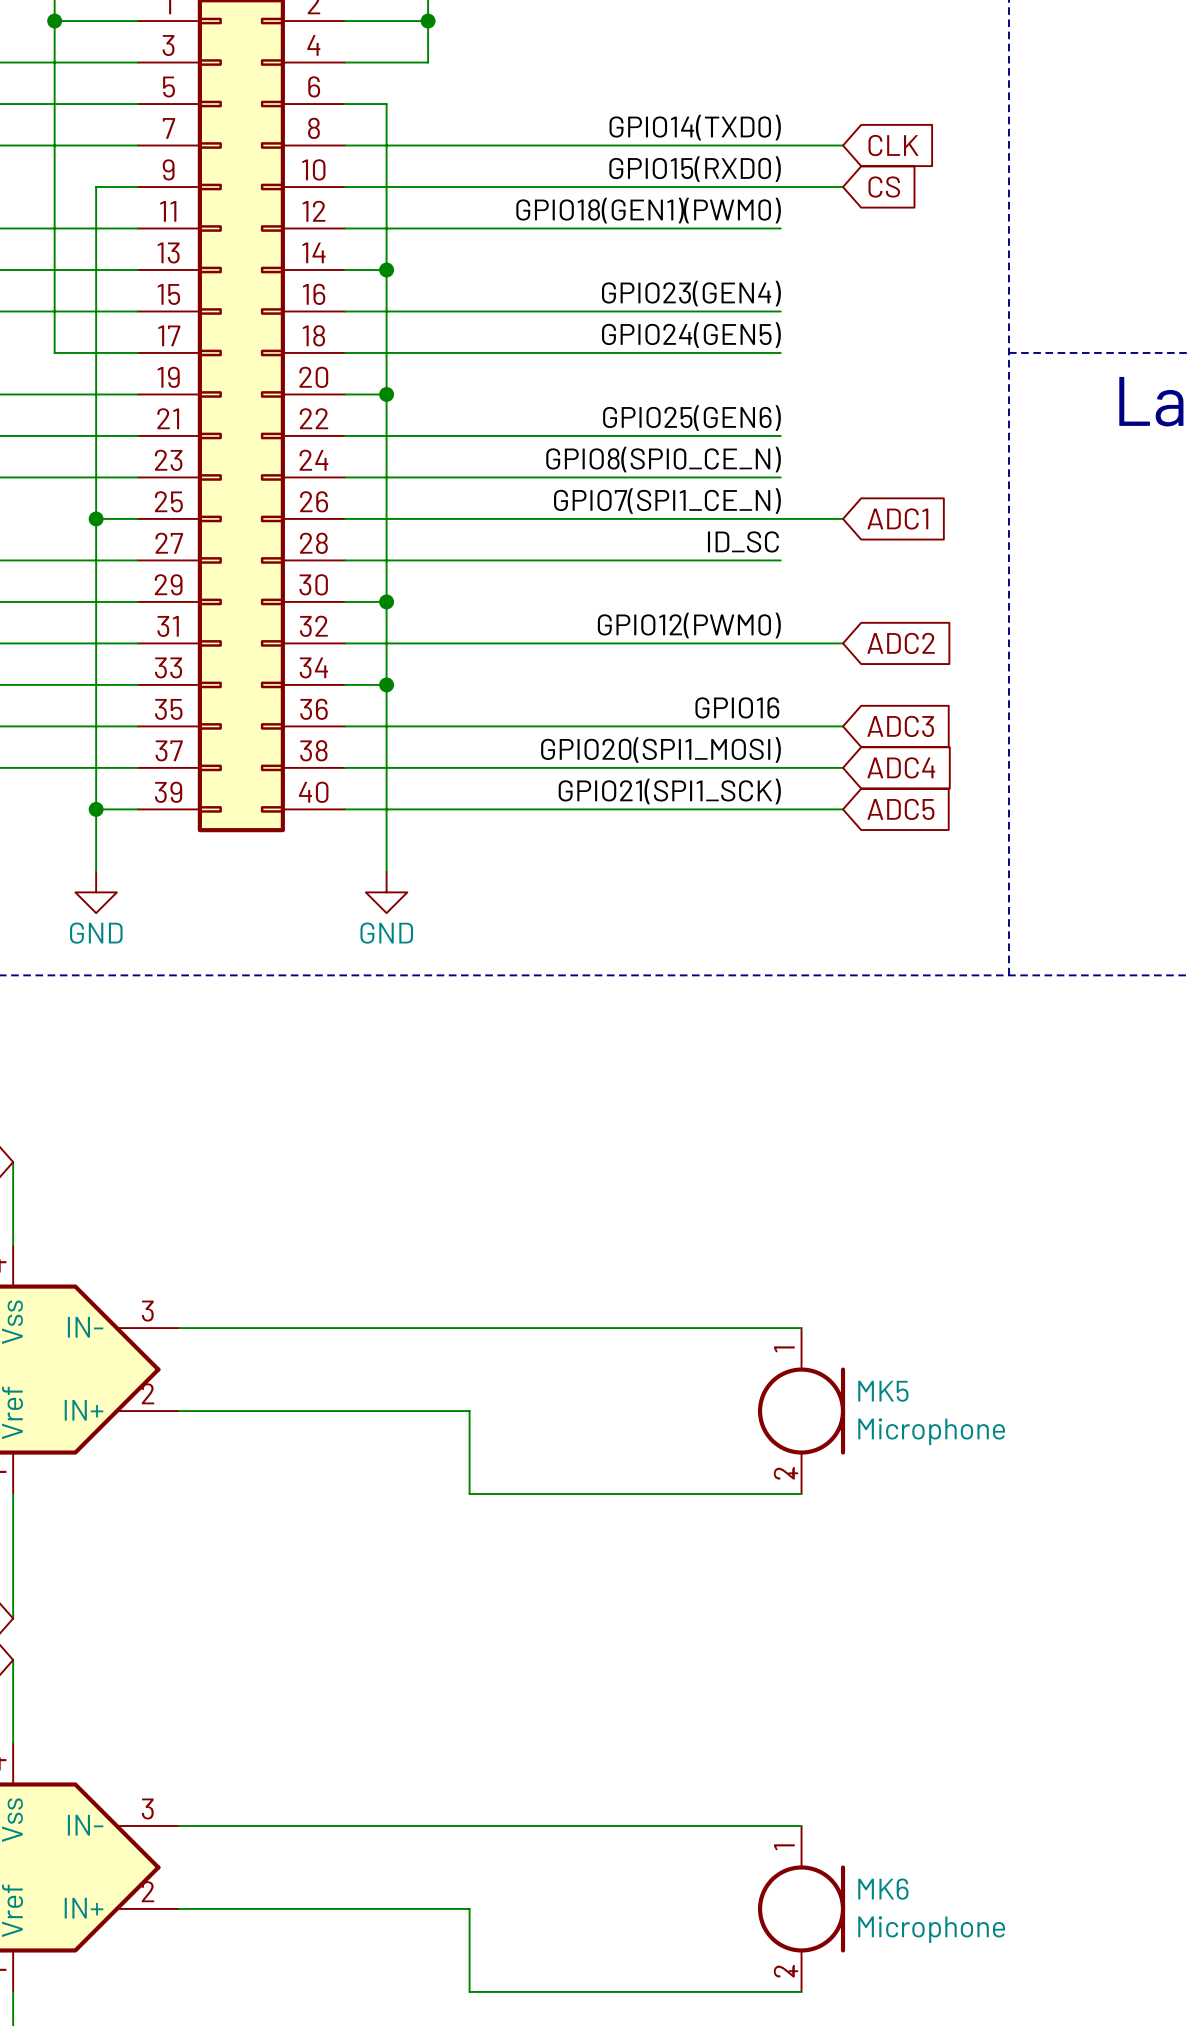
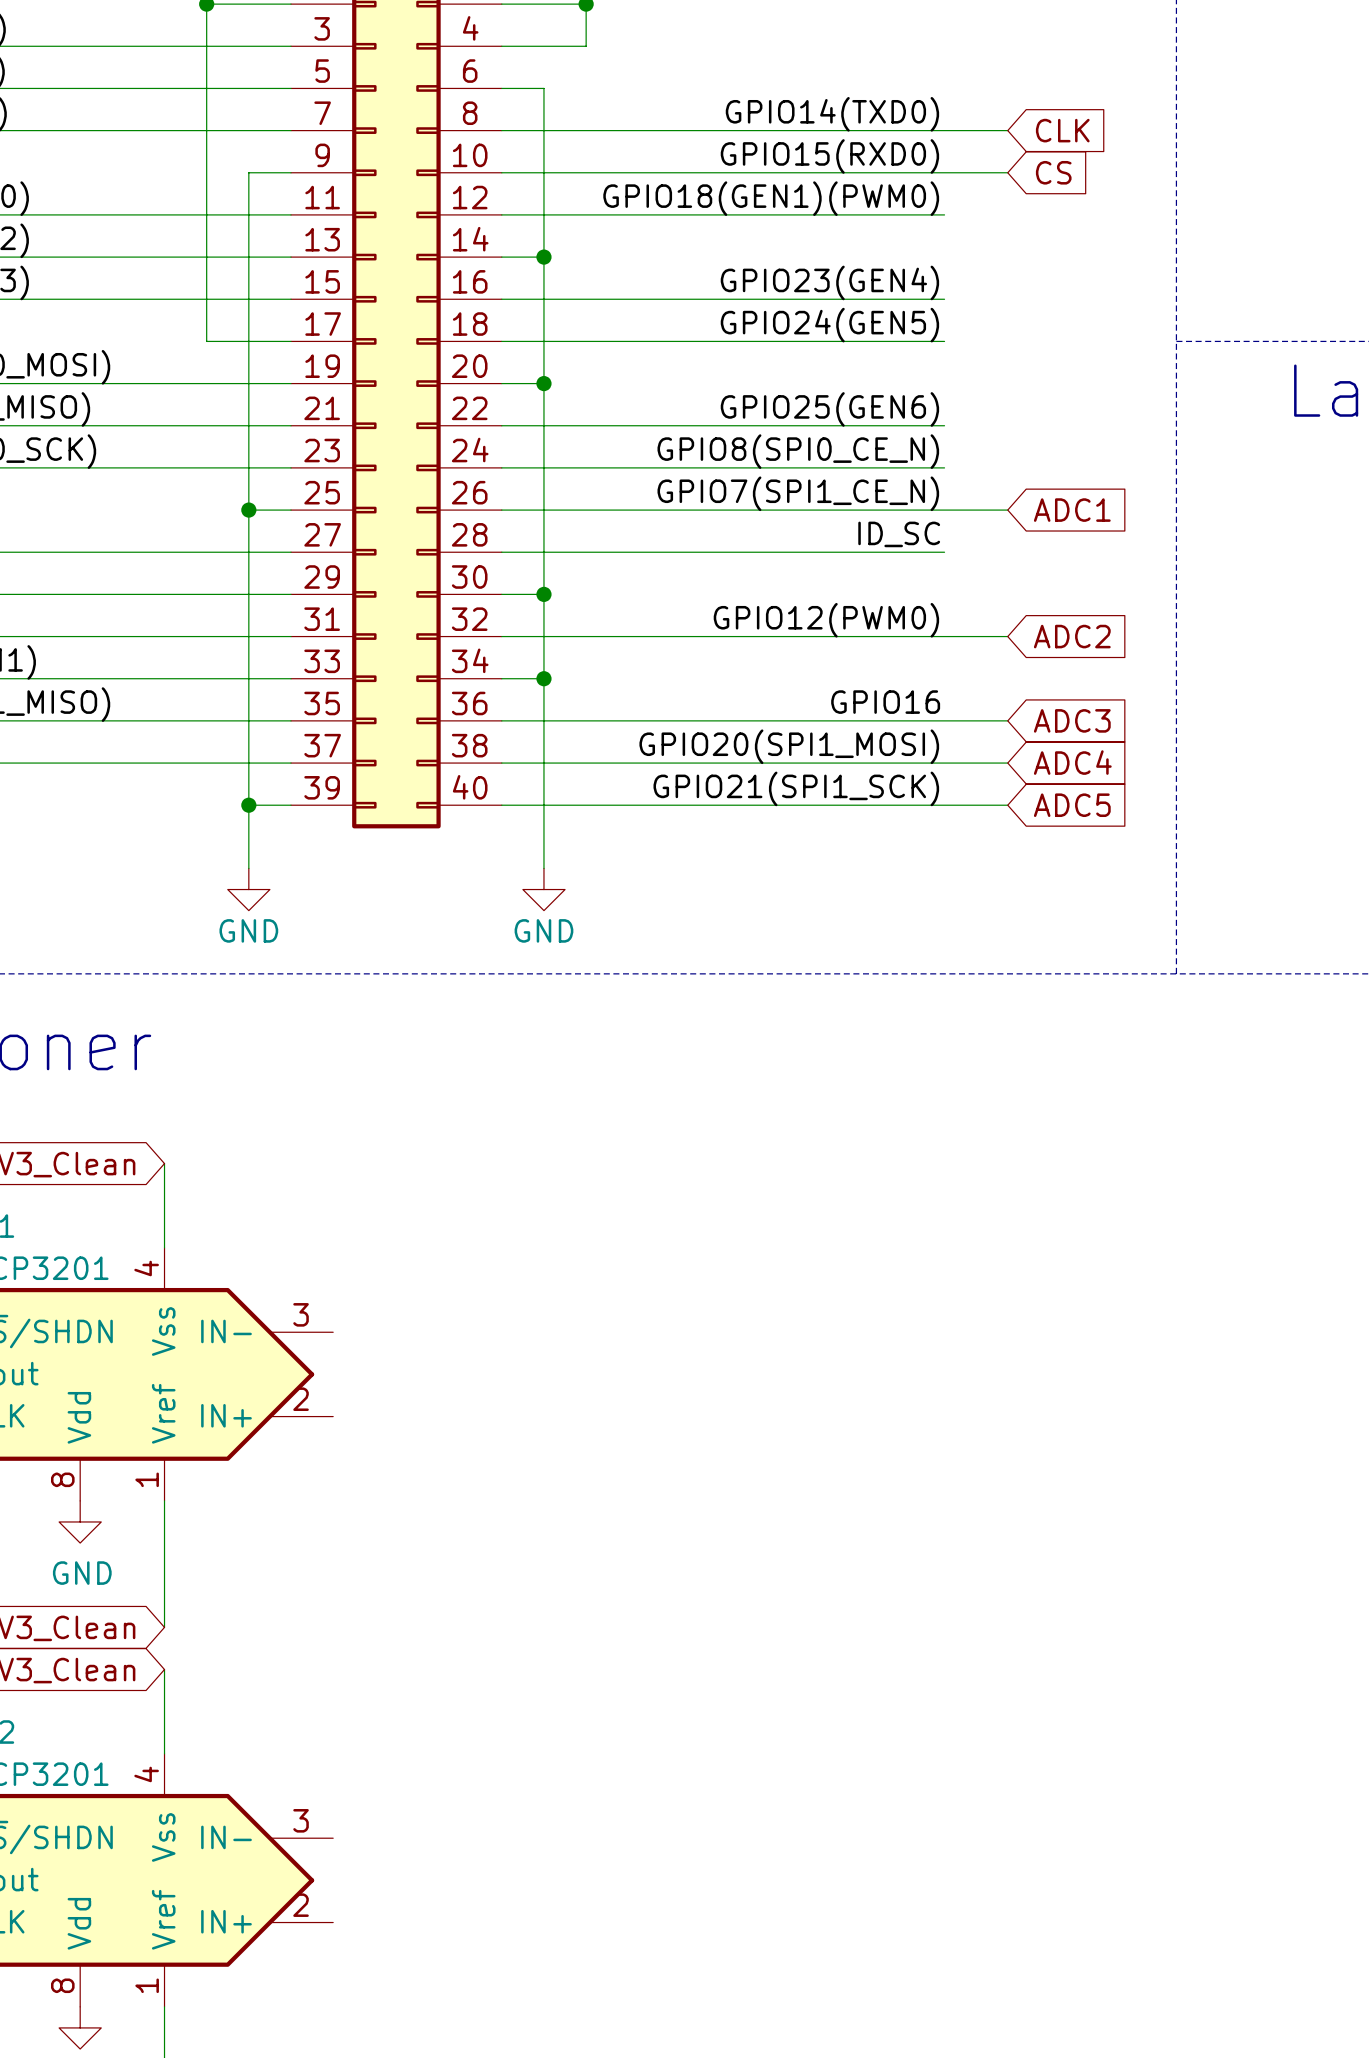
wire: (179, 1328) (801, 1328) -> none
wire: (179, 1411) (469, 1411) (469, 1494) (801, 1494) -> none
MK5: Microphone (801, 1411) -> none
wire: (179, 1825) (801, 1825) -> none
wire: (179, 1908) (469, 1908) (469, 1991) (801, 1991) -> none
MK6: Microphone (801, 1908) -> none

